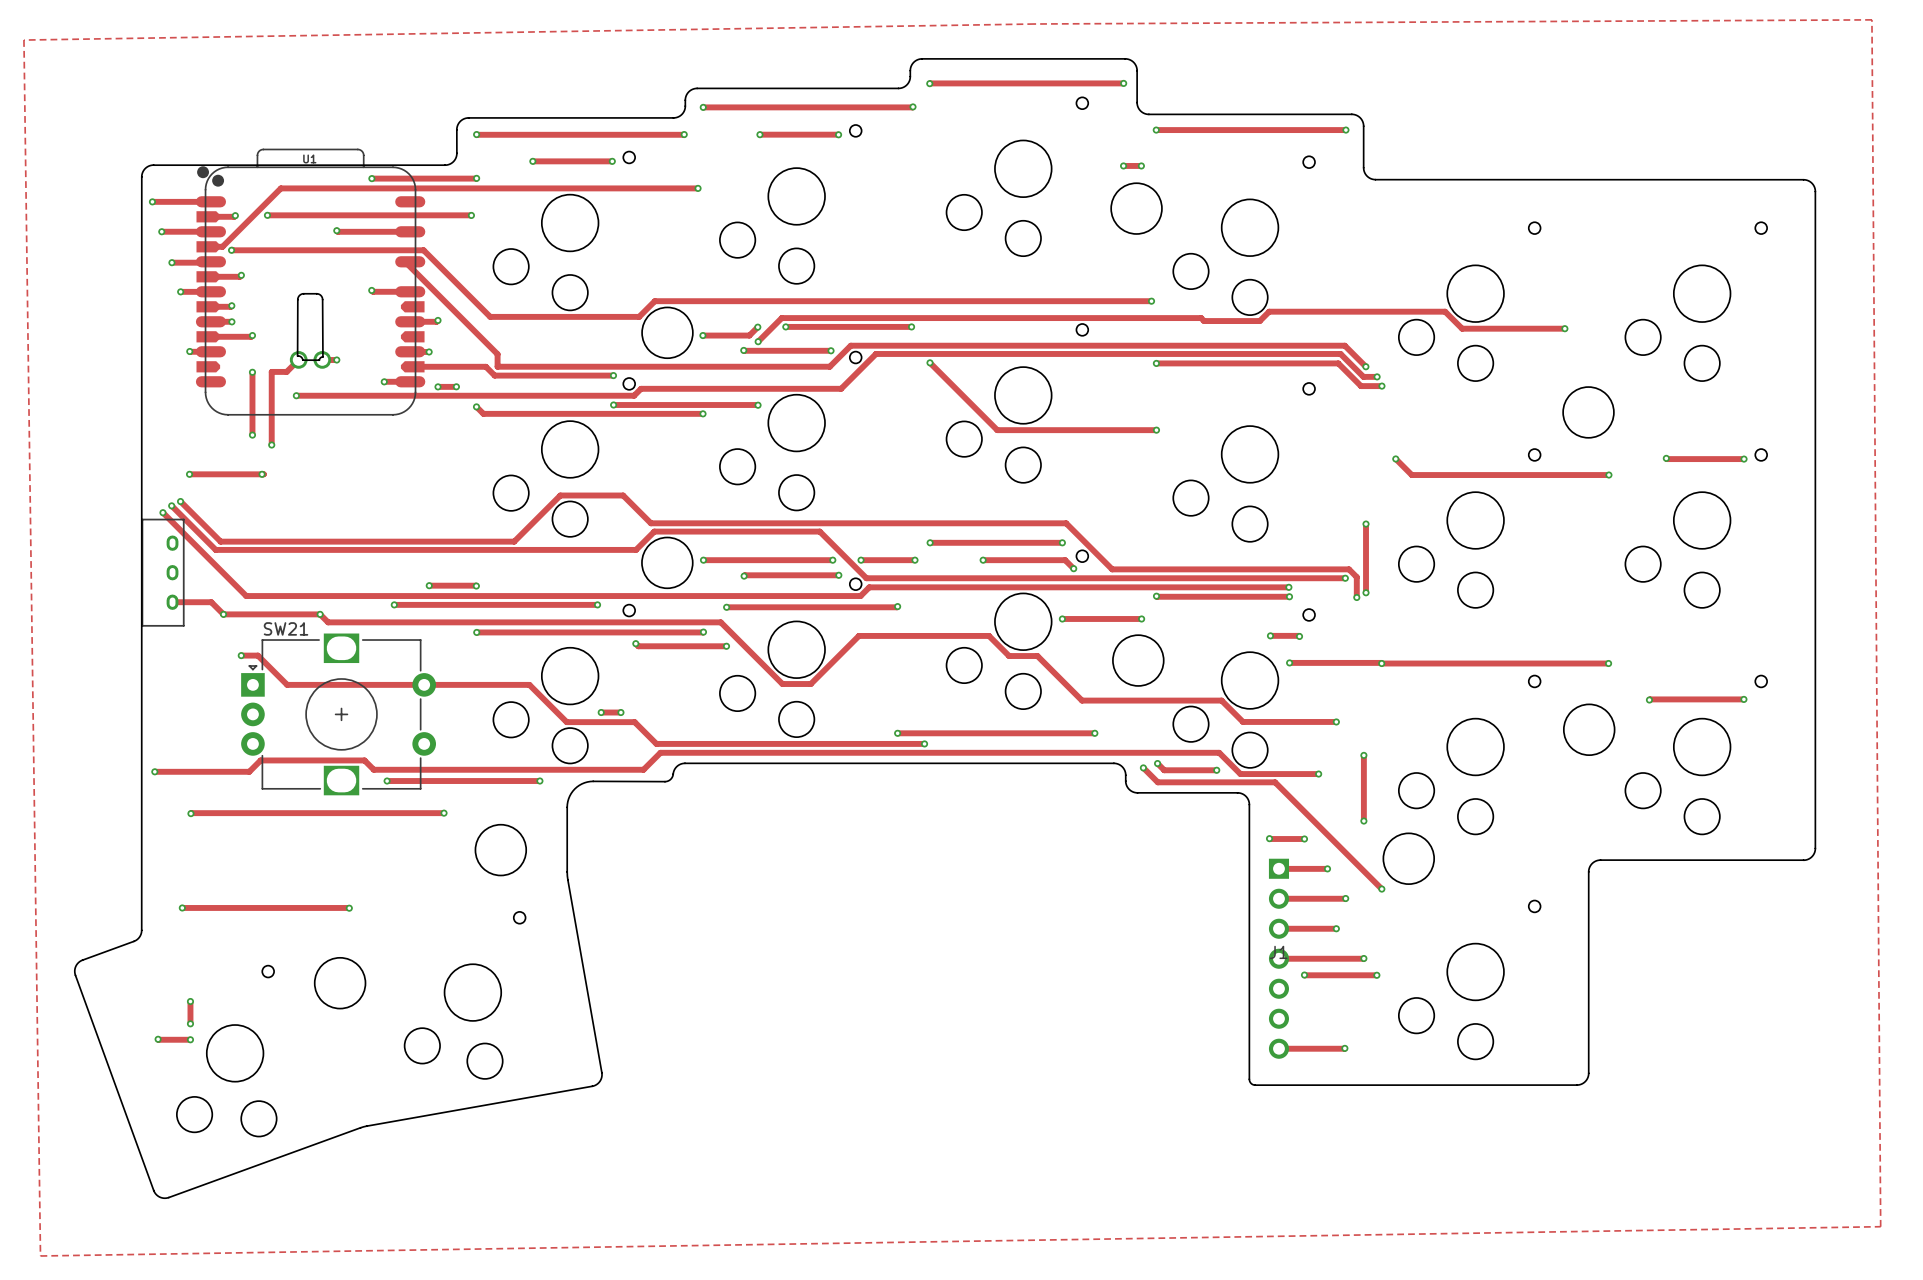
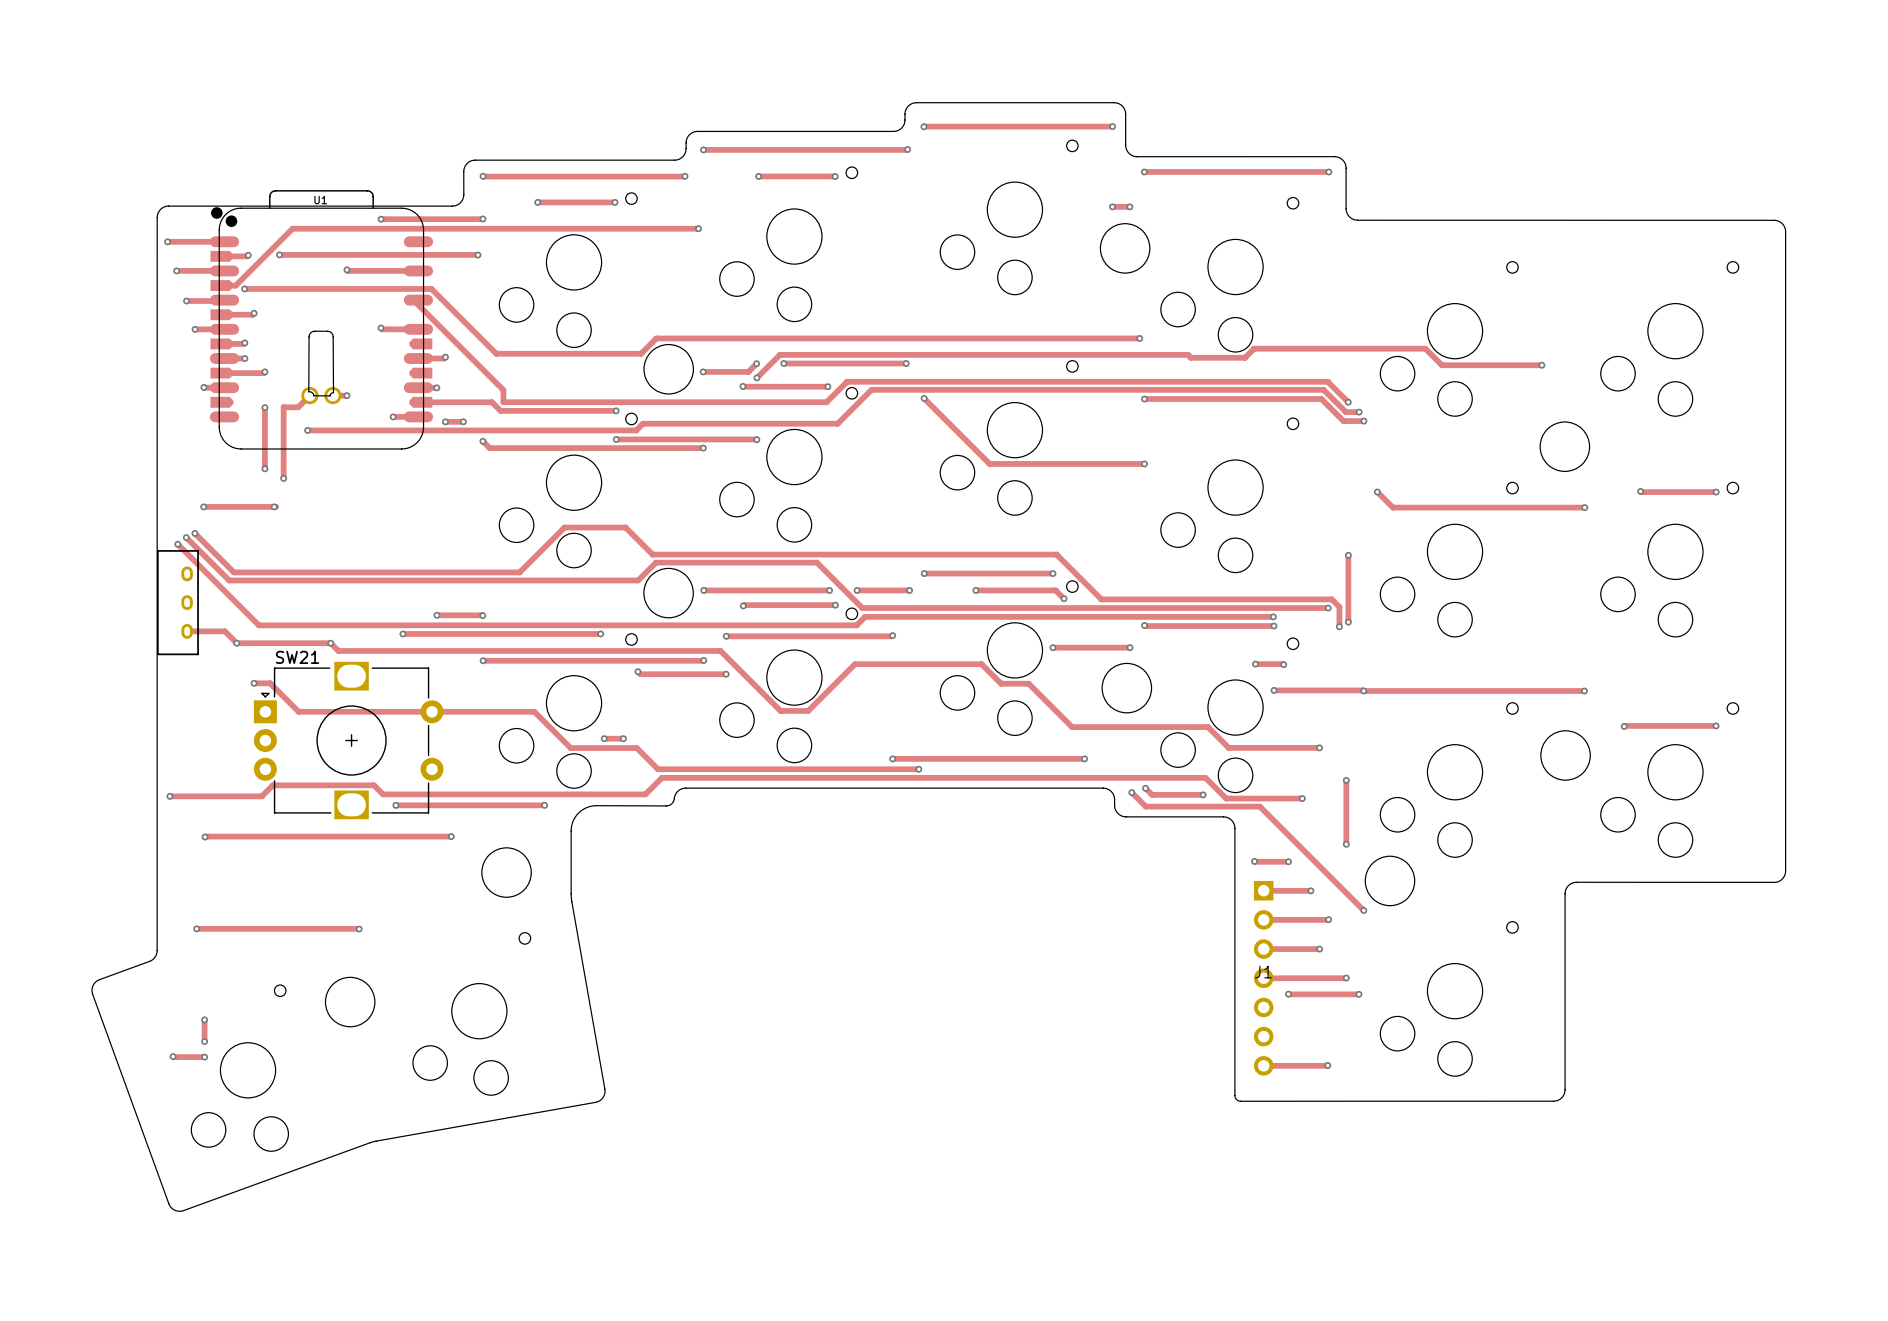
zone outline: (1871, 19) (1880, 1226) (40, 1256) (23, 40) (1034, 24) (1871, 19) -> none

